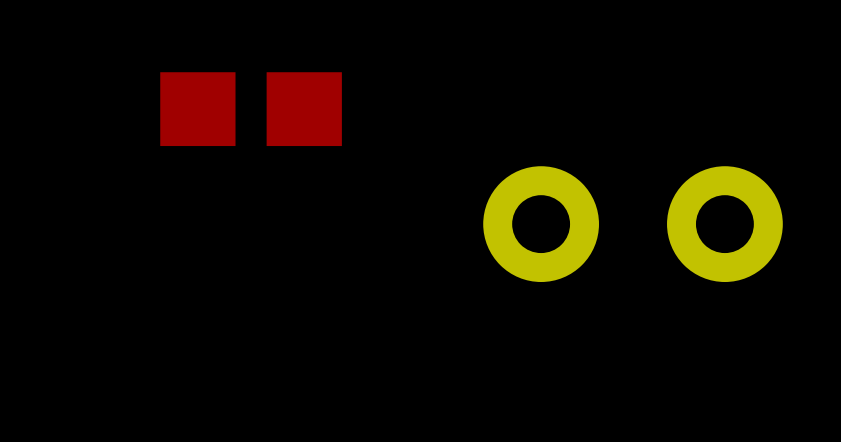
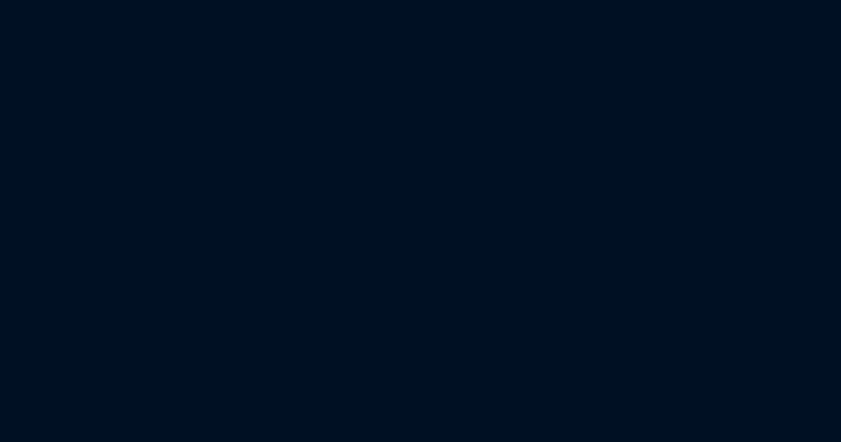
part: (251, 109) -> none
part: (633, 224) -> none

